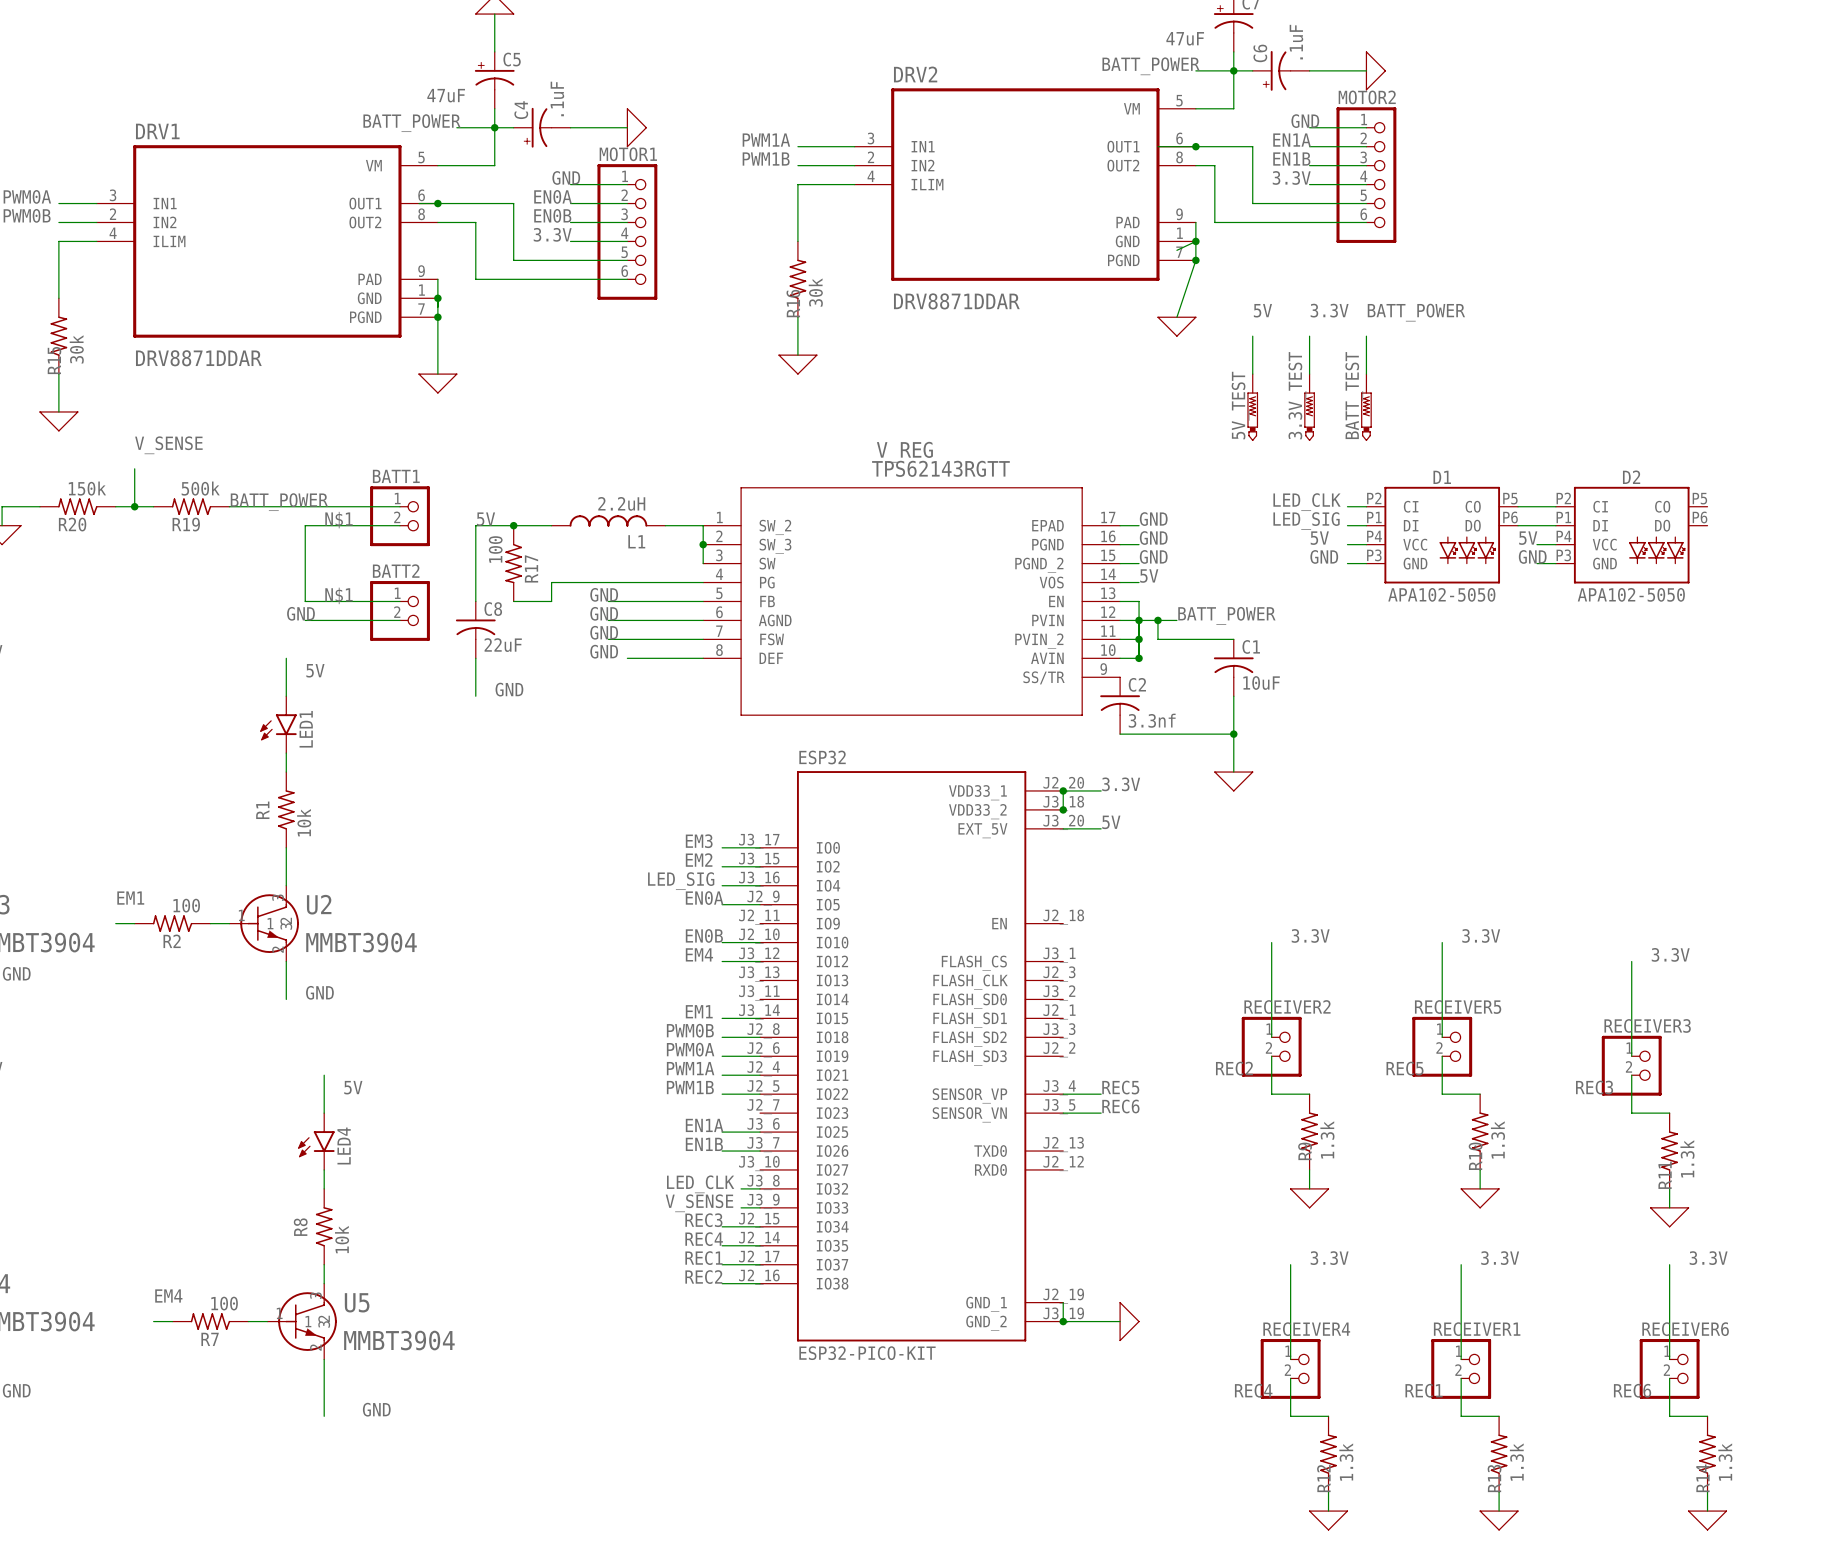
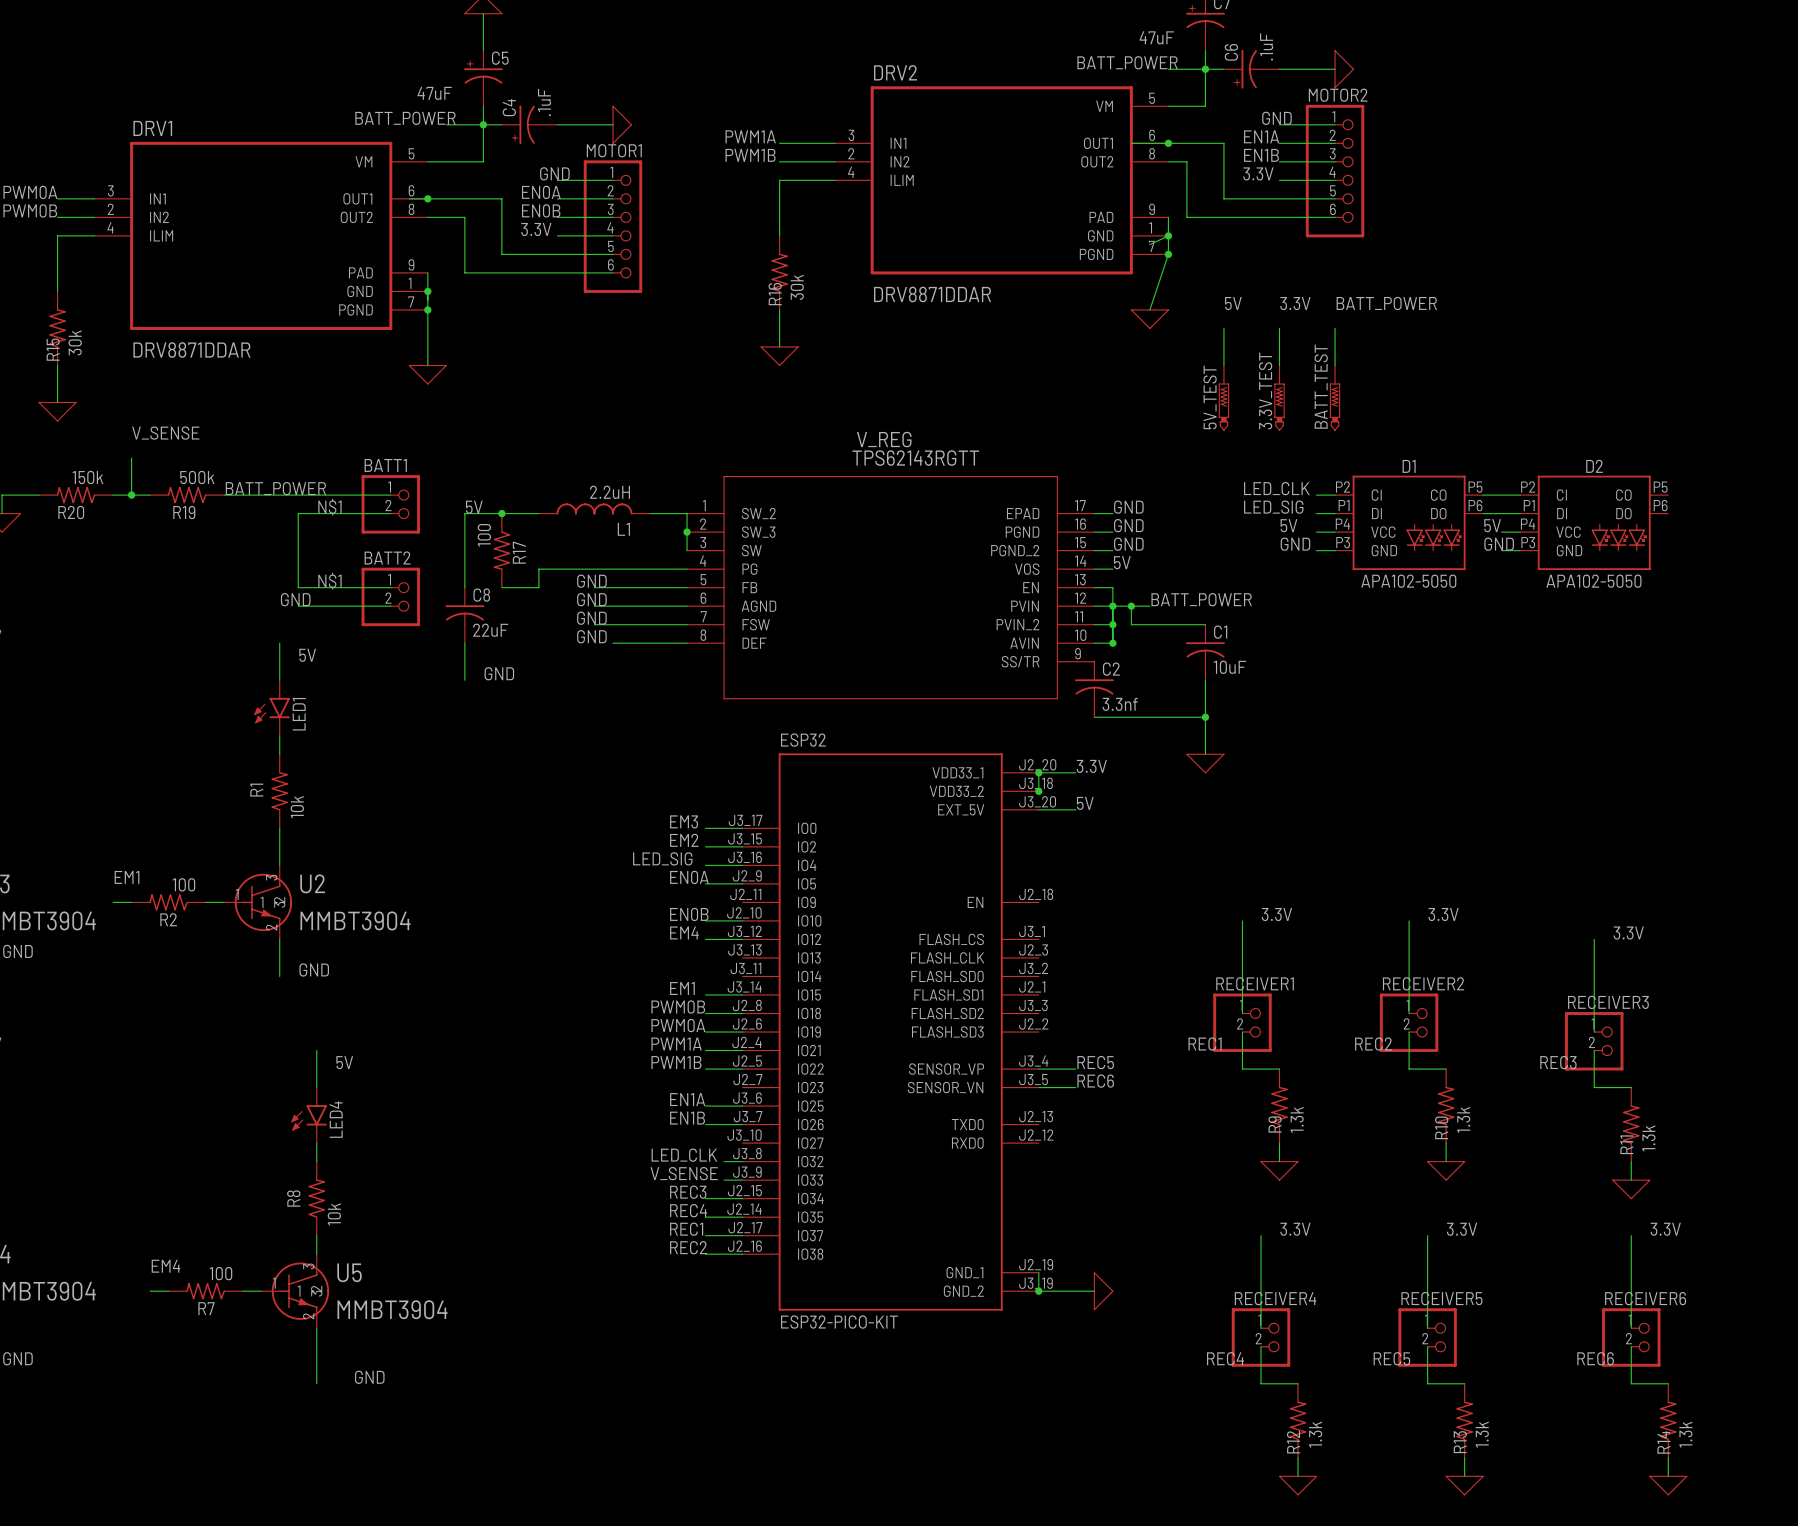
RECEIVER2 name: RECEIVER2 (1287, 1007) -> RECEIVER1 (1255, 983)
RECEIVER5 name: RECEIVER5 (1458, 1007) -> RECEIVER2 (1423, 983)
label: REC2 (1234, 1068) -> REC1 (1205, 1044)
label: REC5 (1405, 1068) -> REC2 (1373, 1044)
RECEIVER1 name: RECEIVER1 (1477, 1329) -> RECEIVER5 (1441, 1298)
label: REC1 (1424, 1390) -> REC5 (1391, 1358)

